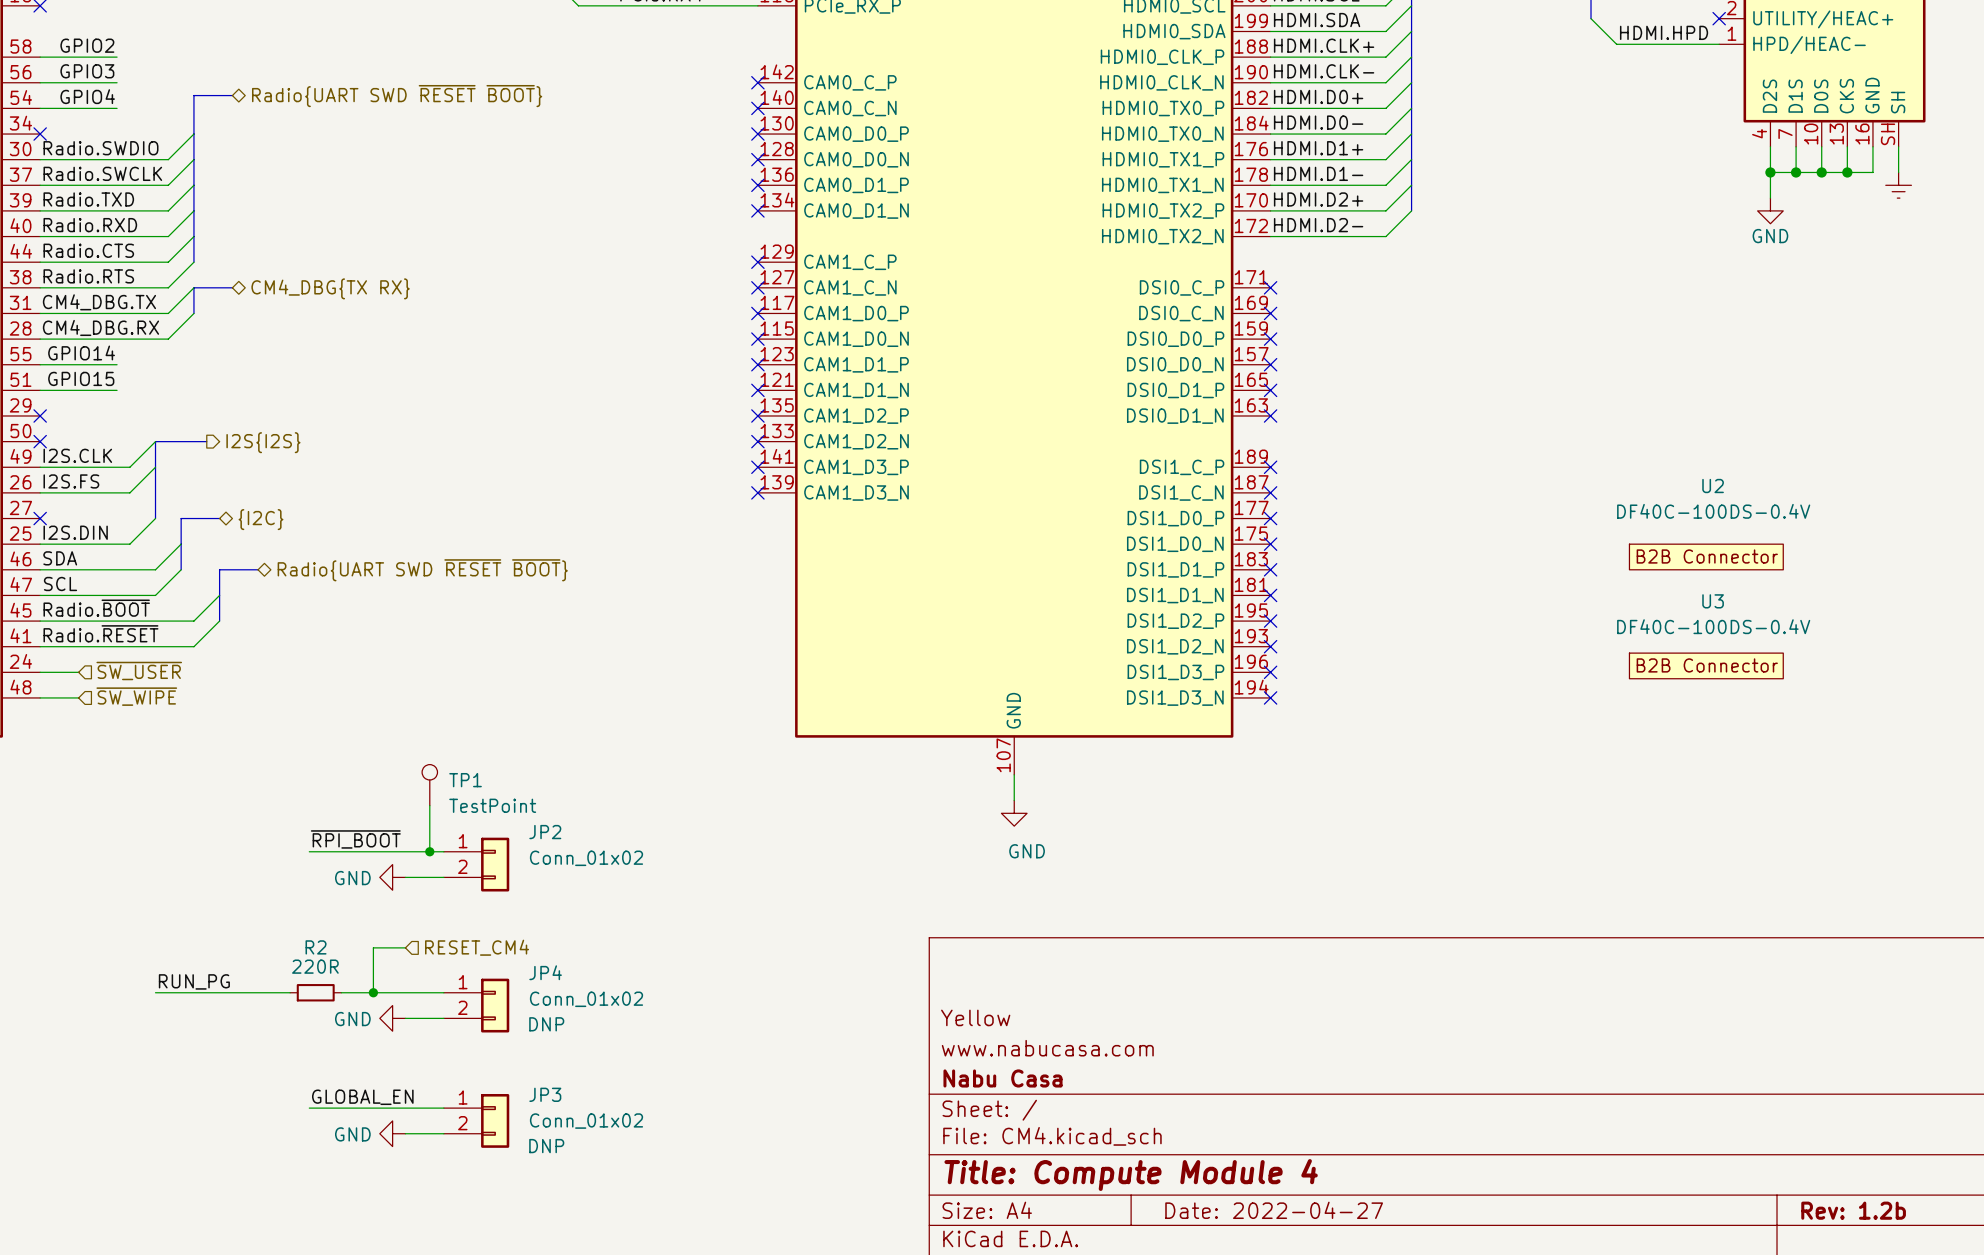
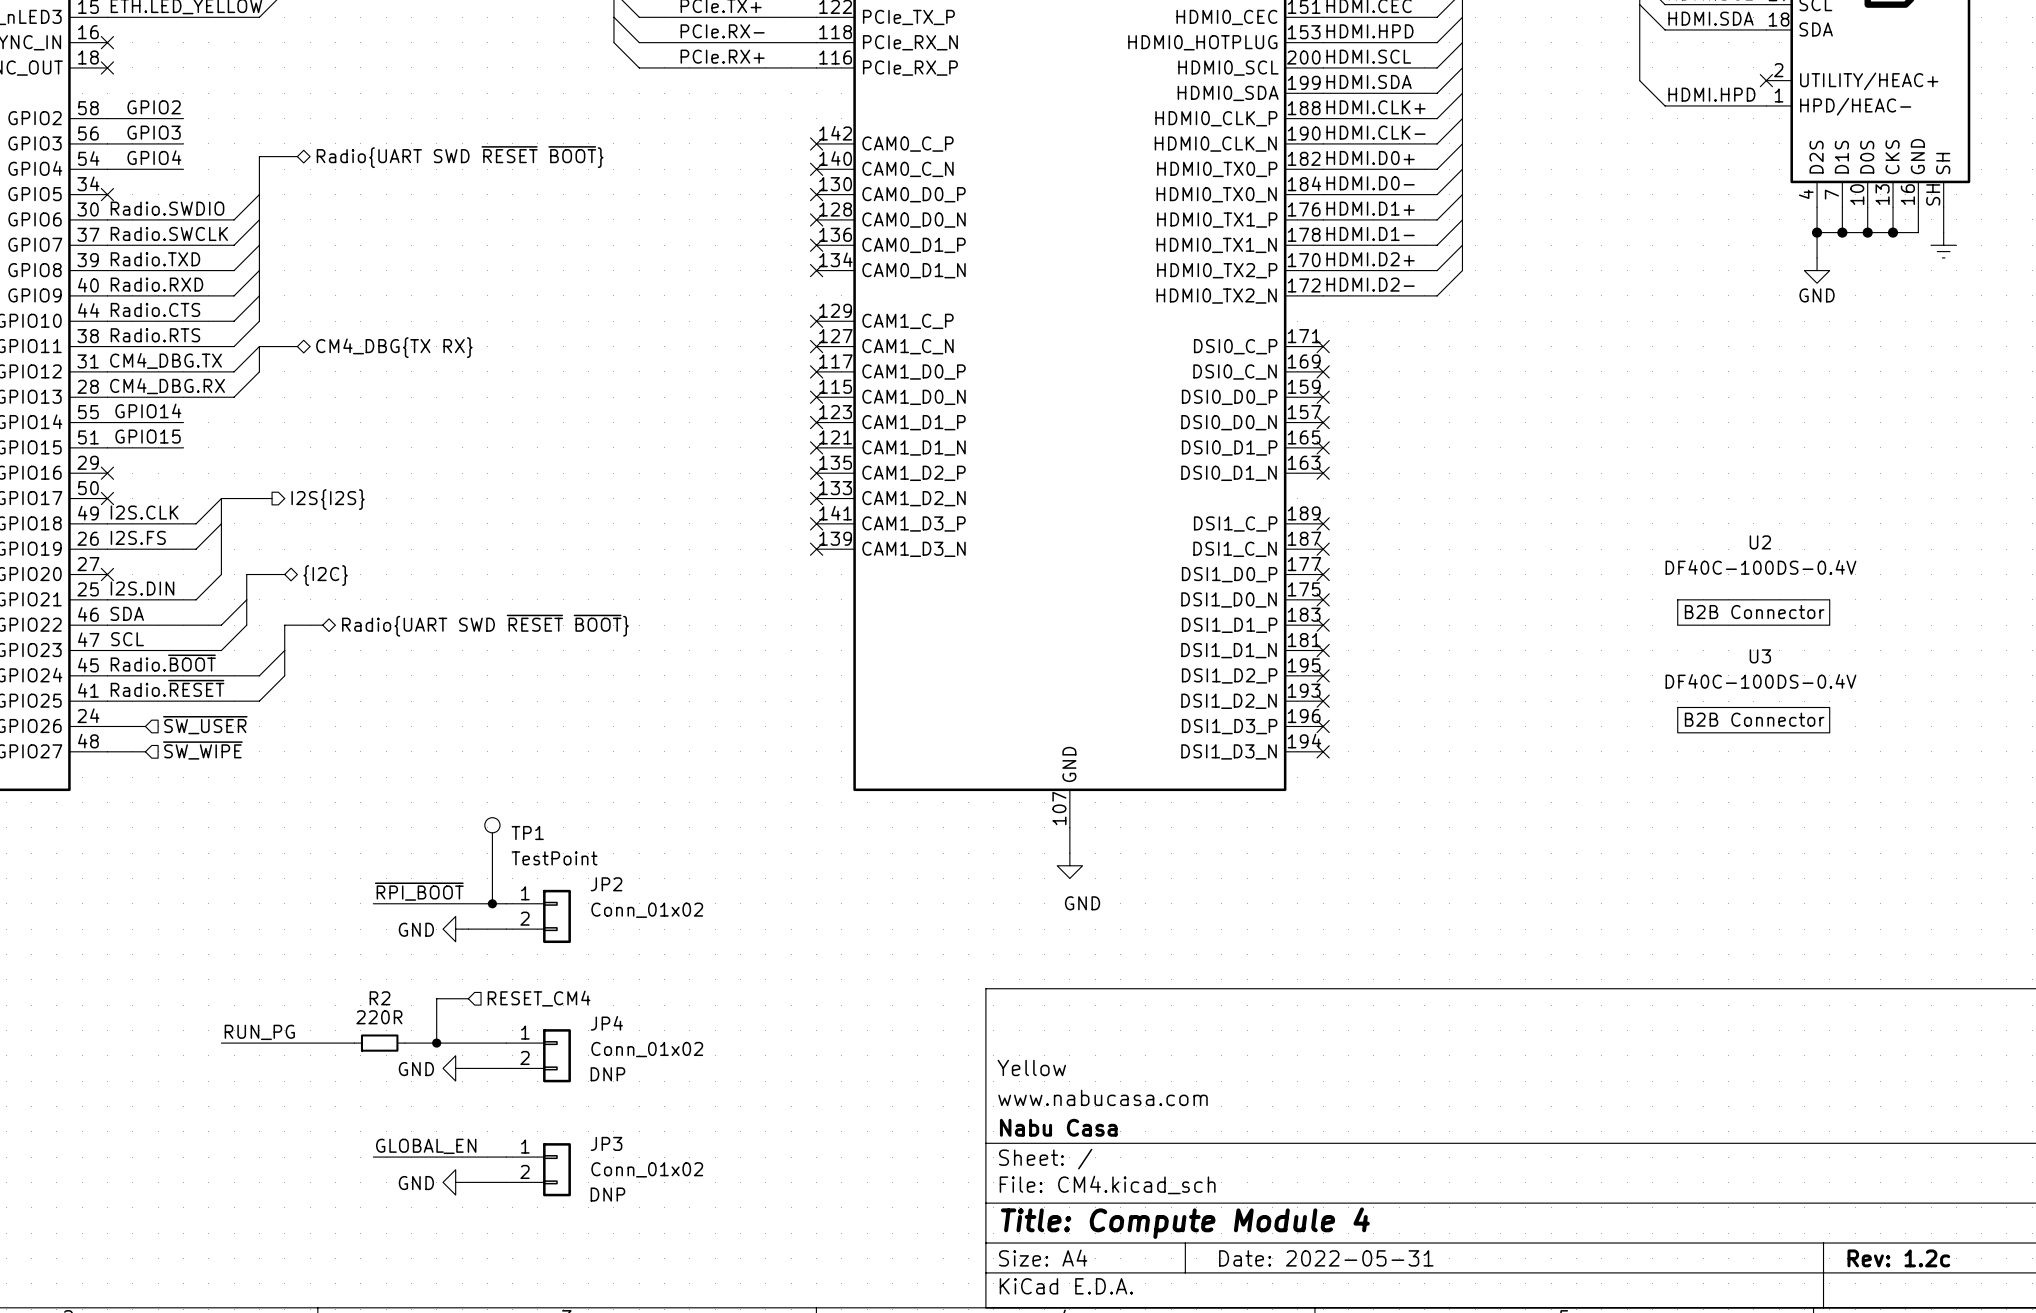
title block: Date: 2022-04-27 (1274, 1210) -> Date: 2022-05-31 (1326, 1258)
title block: Rev: 1.2b (1853, 1210) -> Rev: 1.2c (1898, 1258)

